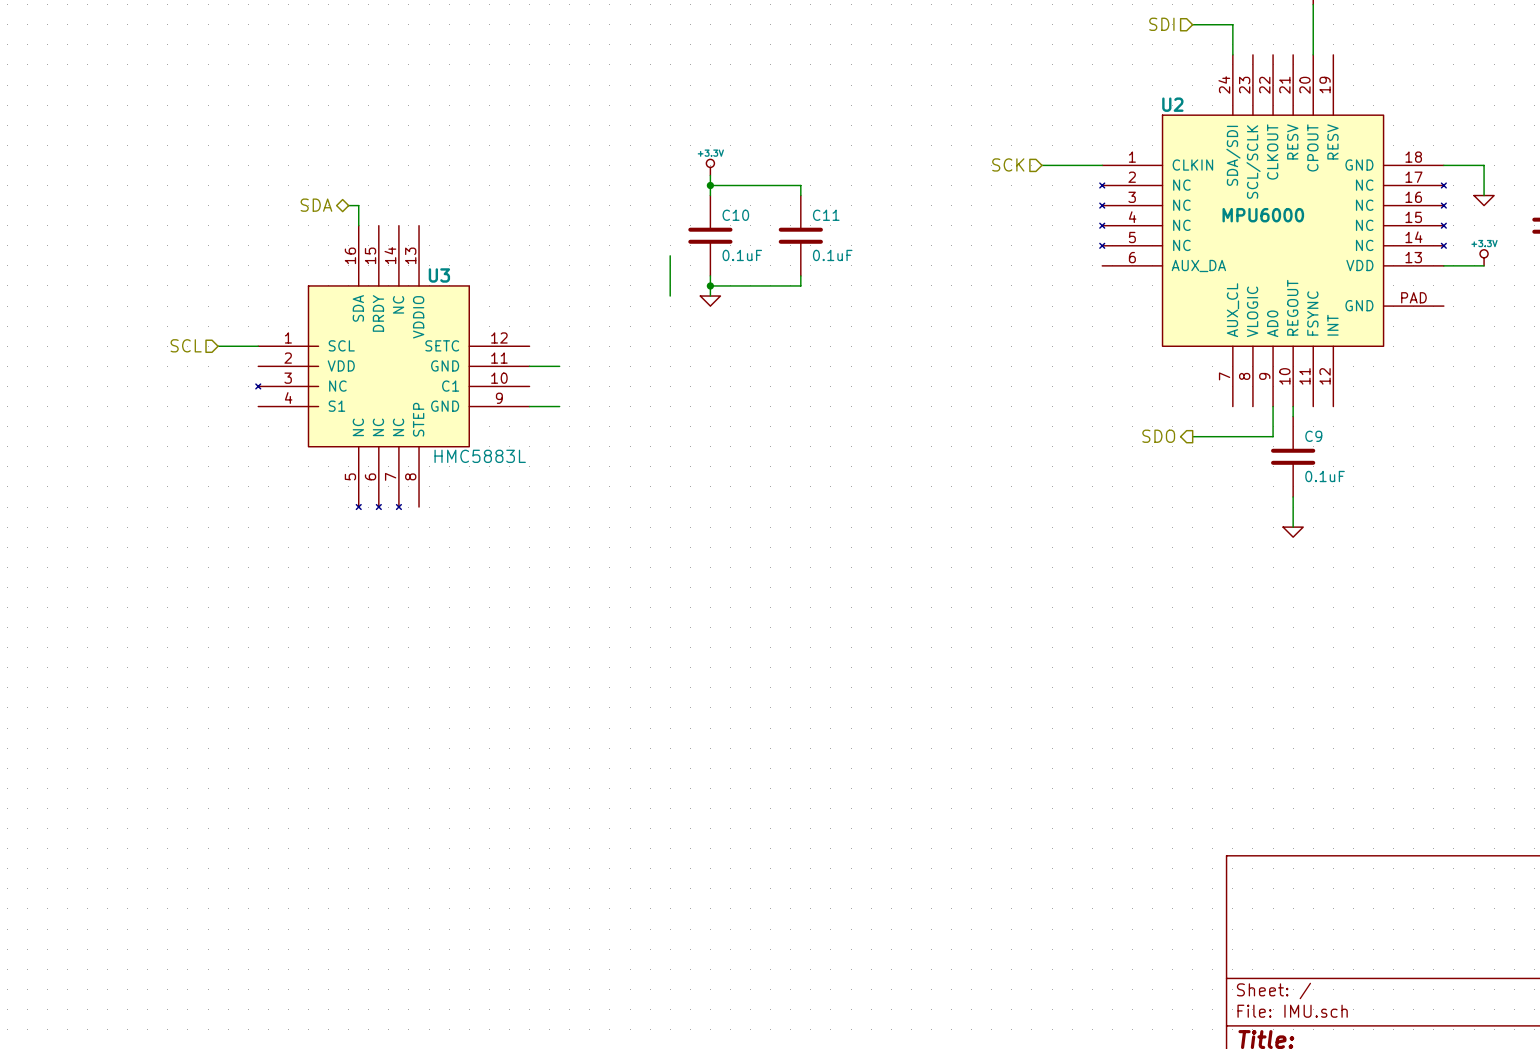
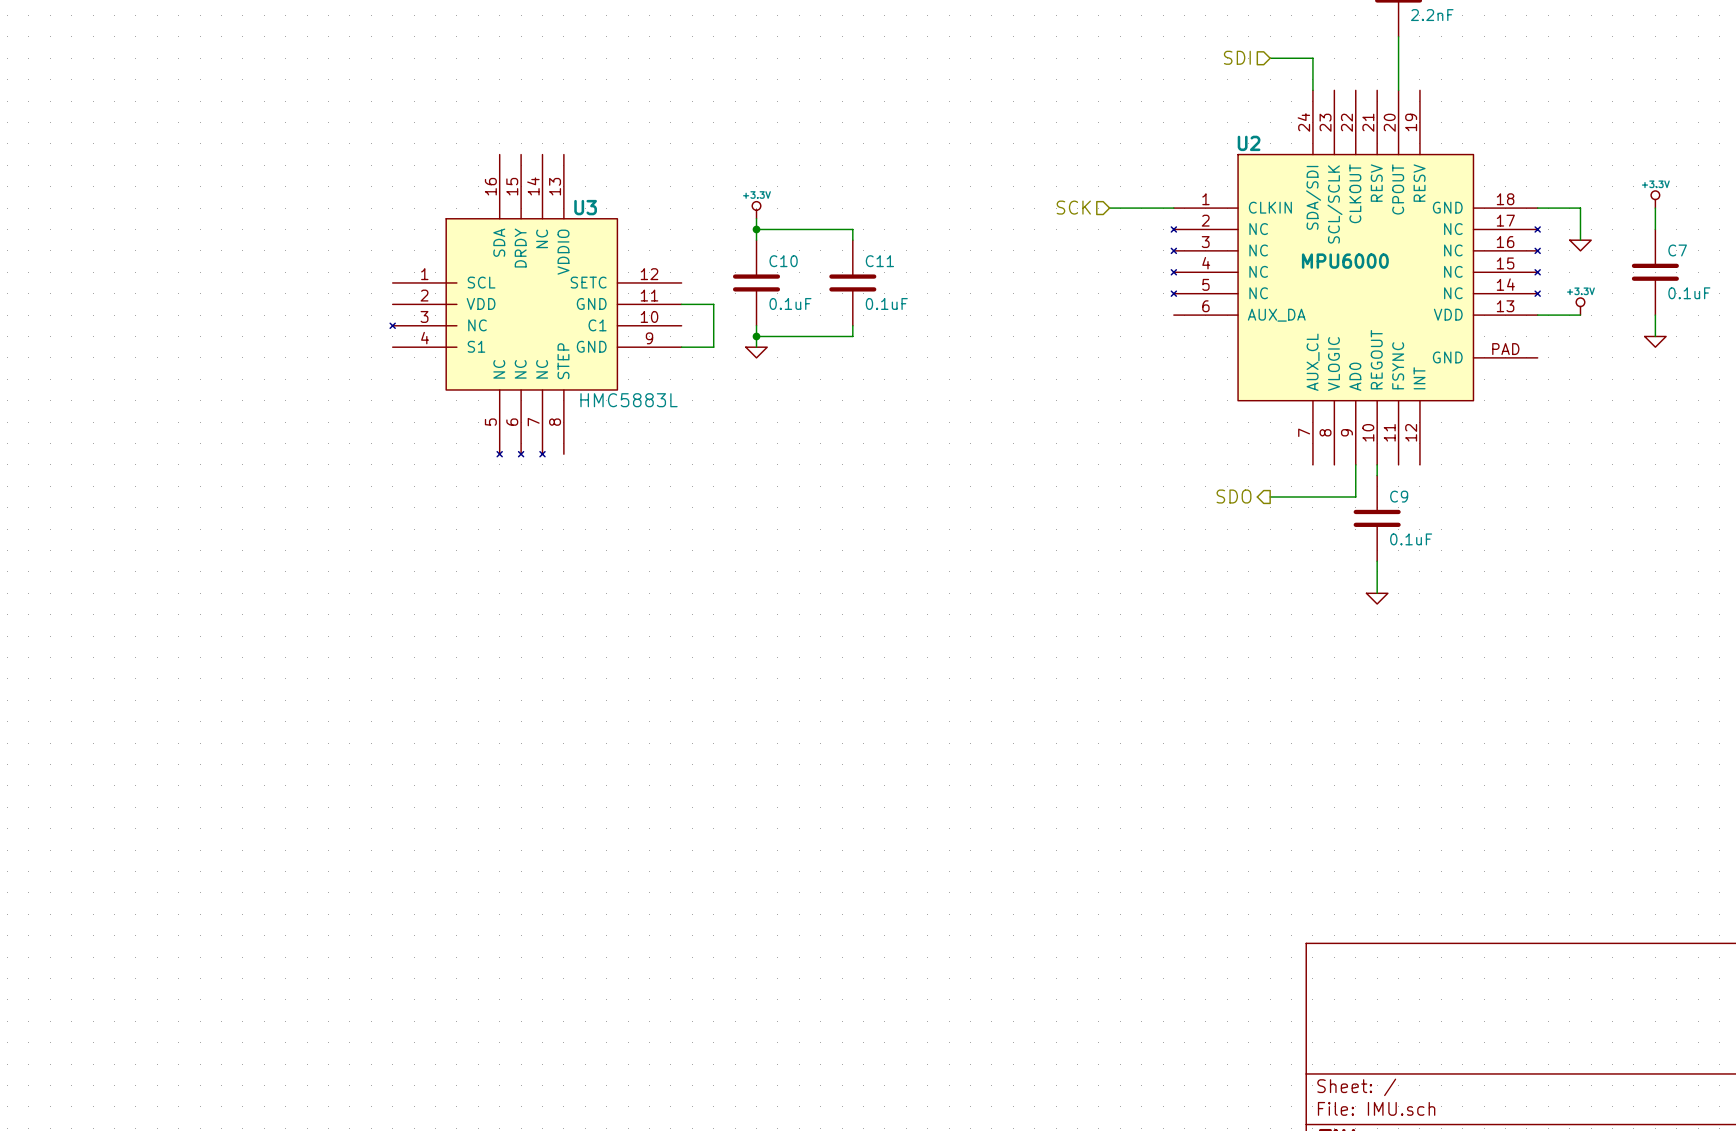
hierarchical label: SDA (316, 205) -> none
wire: (348, 205) (358, 205) (358, 225) -> none
hierarchical label: SCL (186, 345) -> none
wire: (218, 346) (258, 346) -> none
wire: (529, 366) (559, 366) -> (681, 347) (713, 347)
U3 position: (392, 367) -> (535, 305)
wire: (529, 406) (559, 406) -> (681, 304) (713, 304)

